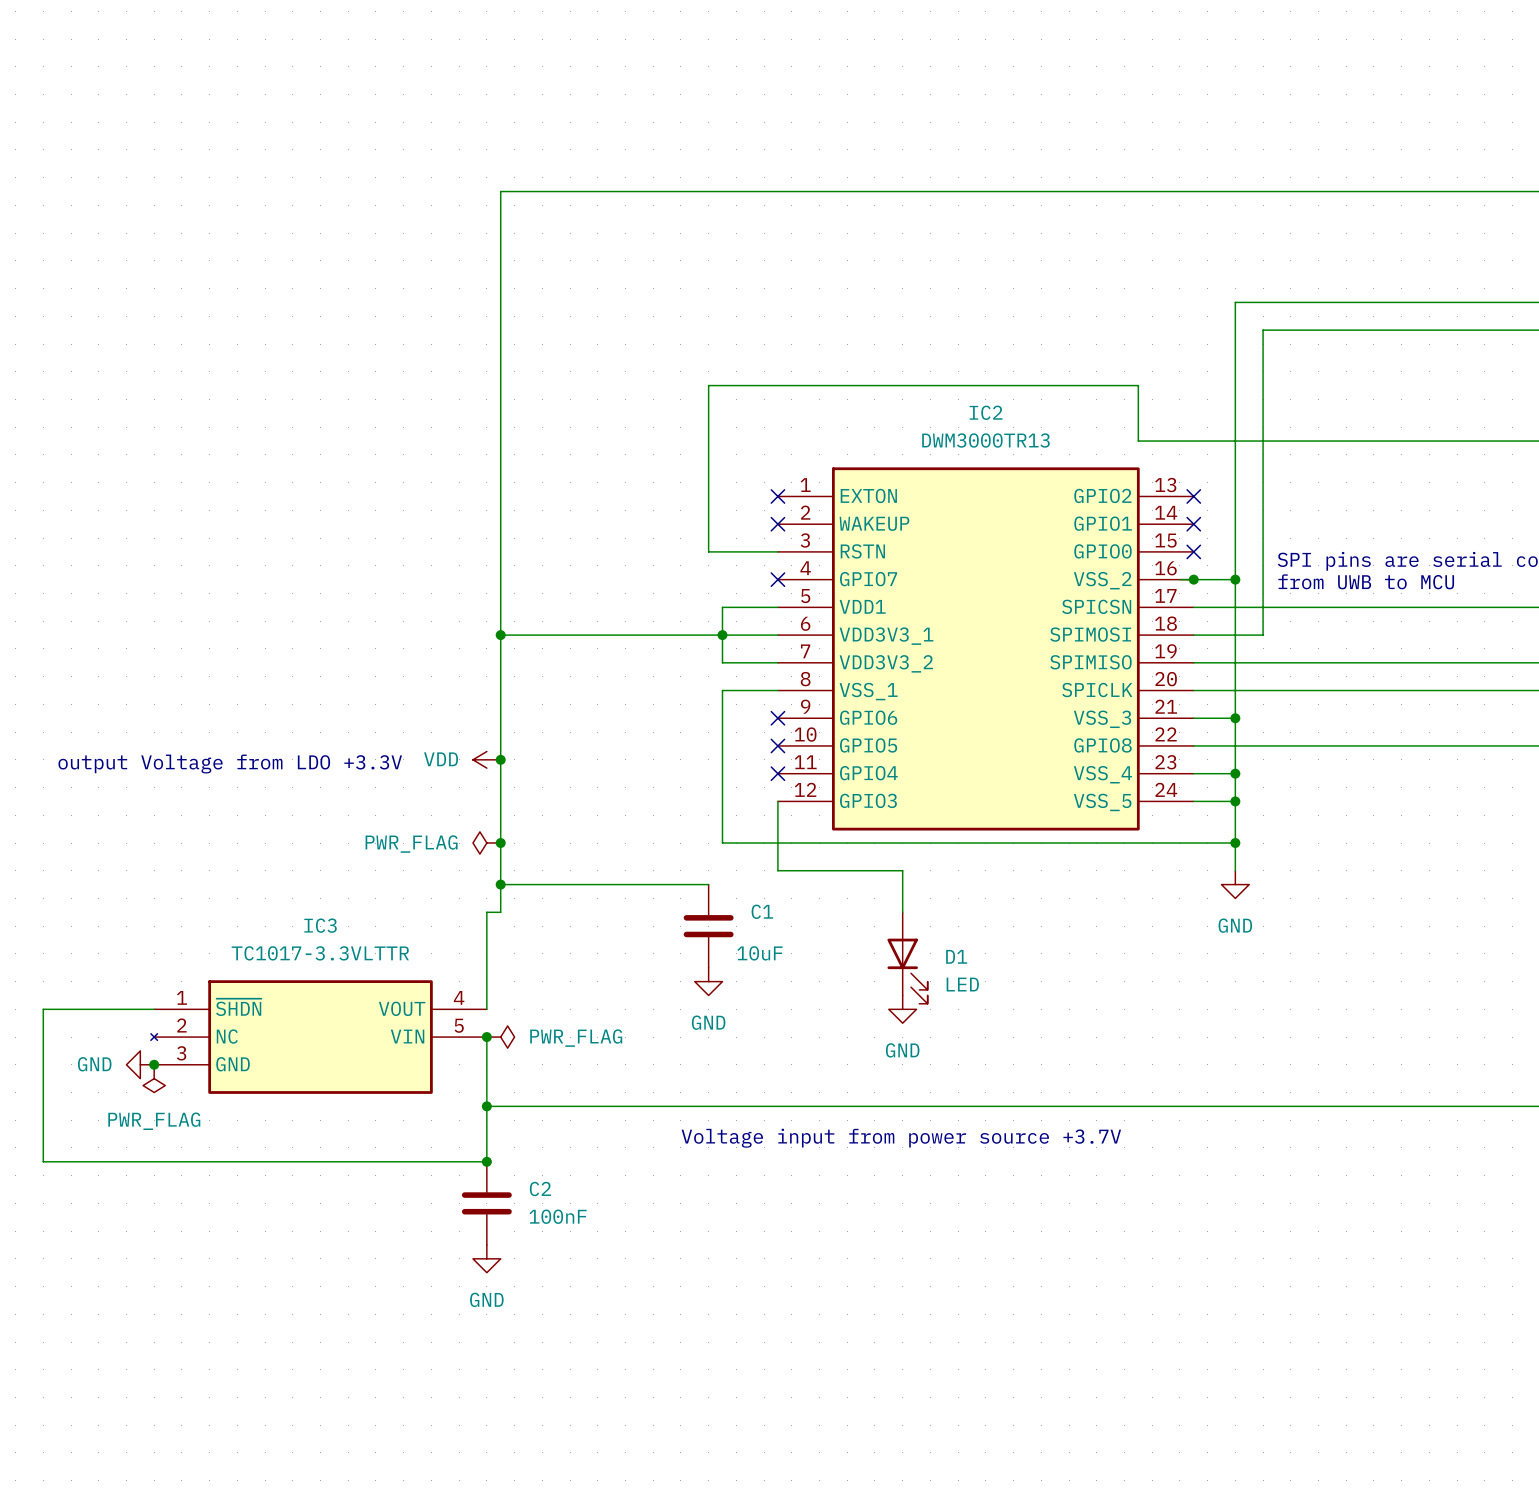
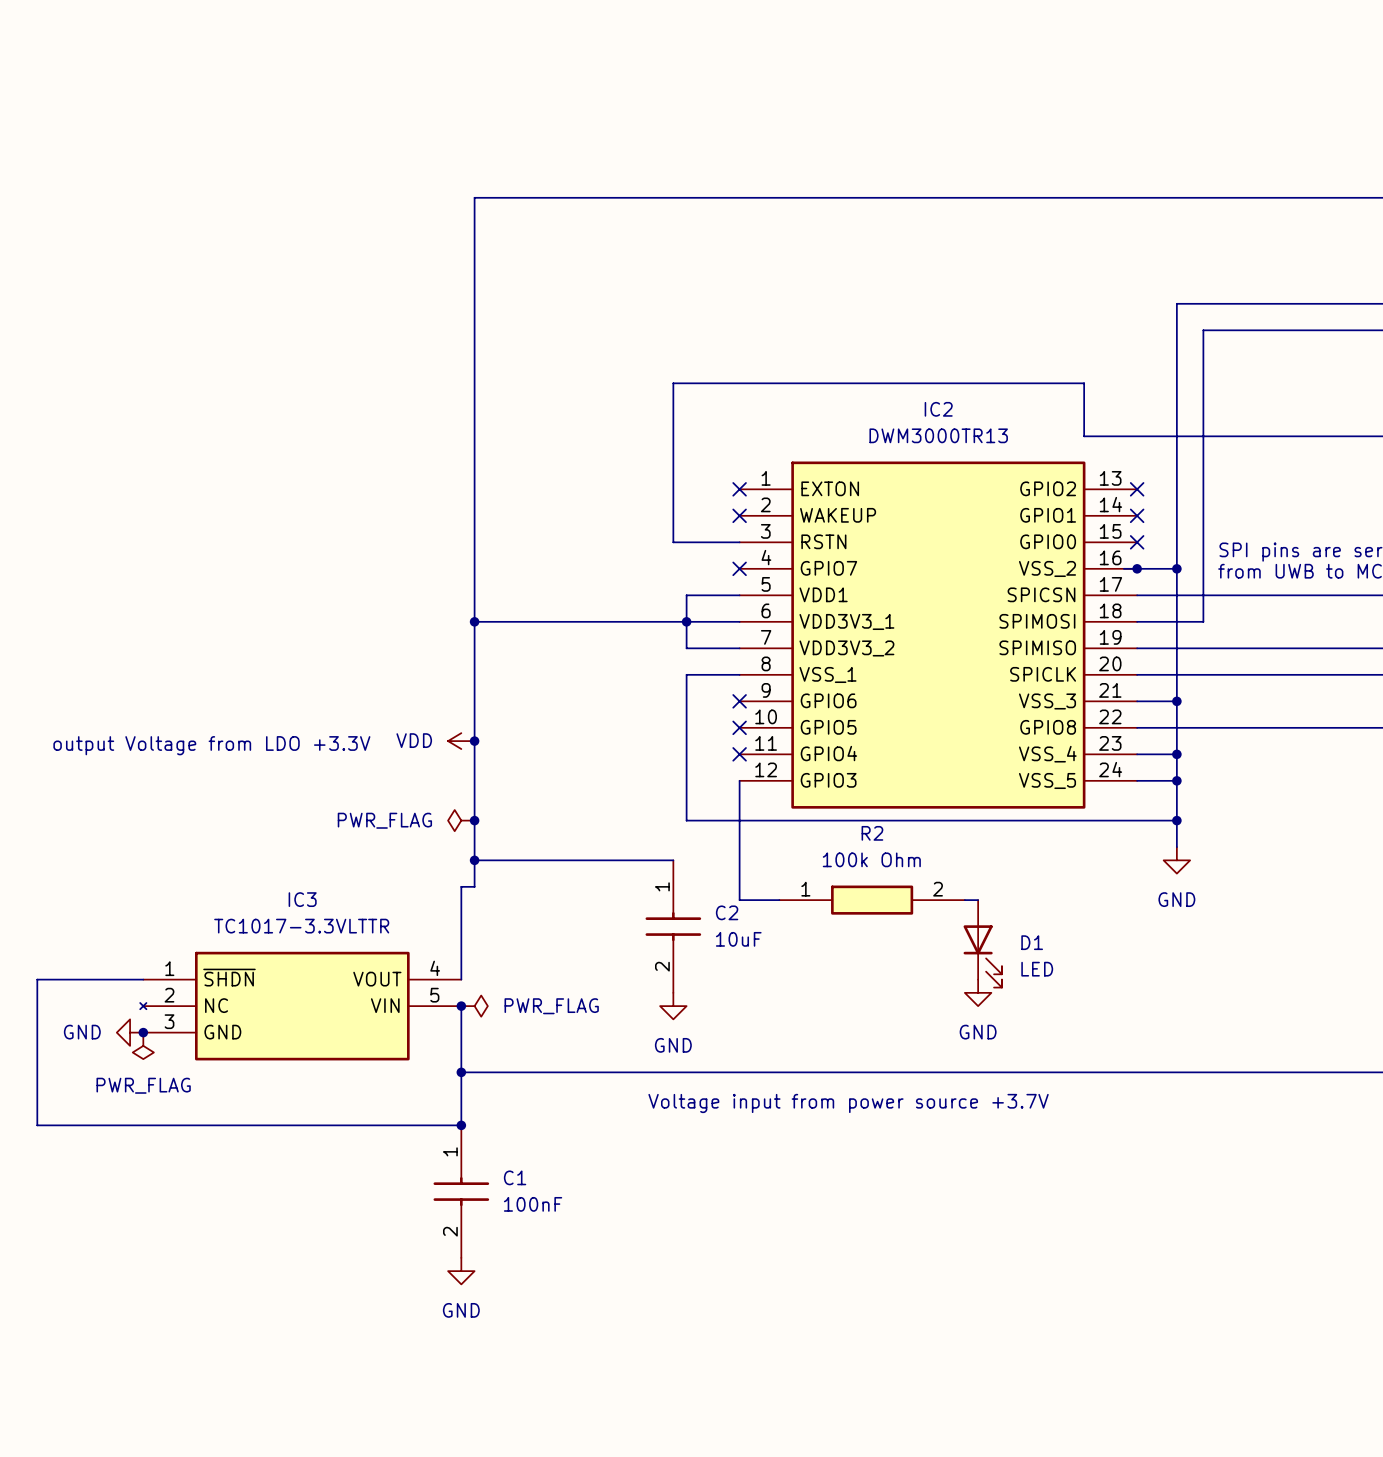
wire: (777, 870) (902, 870) (902, 912) -> (739, 847) (739, 900) (779, 900)
C1 symbol: [683, 884, 734, 968] -> [433, 1125, 490, 1258]
R2: none -> 100k Ohm (872, 900)
wire: none -> (964, 900) (978, 900)
C1 value: 10uF (760, 953) -> 100nF (533, 1204)
D1 position: (907, 958) -> (982, 943)
power symbol position: GND (708, 981) -> GND (673, 1006)
power symbol: GND (902, 1009) -> none
power symbol: none -> GND (978, 992)
C2 symbol: [461, 1161, 512, 1245] -> [645, 860, 702, 993]
C2 value: 100nF (558, 1216) -> 10uF (738, 939)
power symbol position: GND (486, 1258) -> GND (461, 1271)

